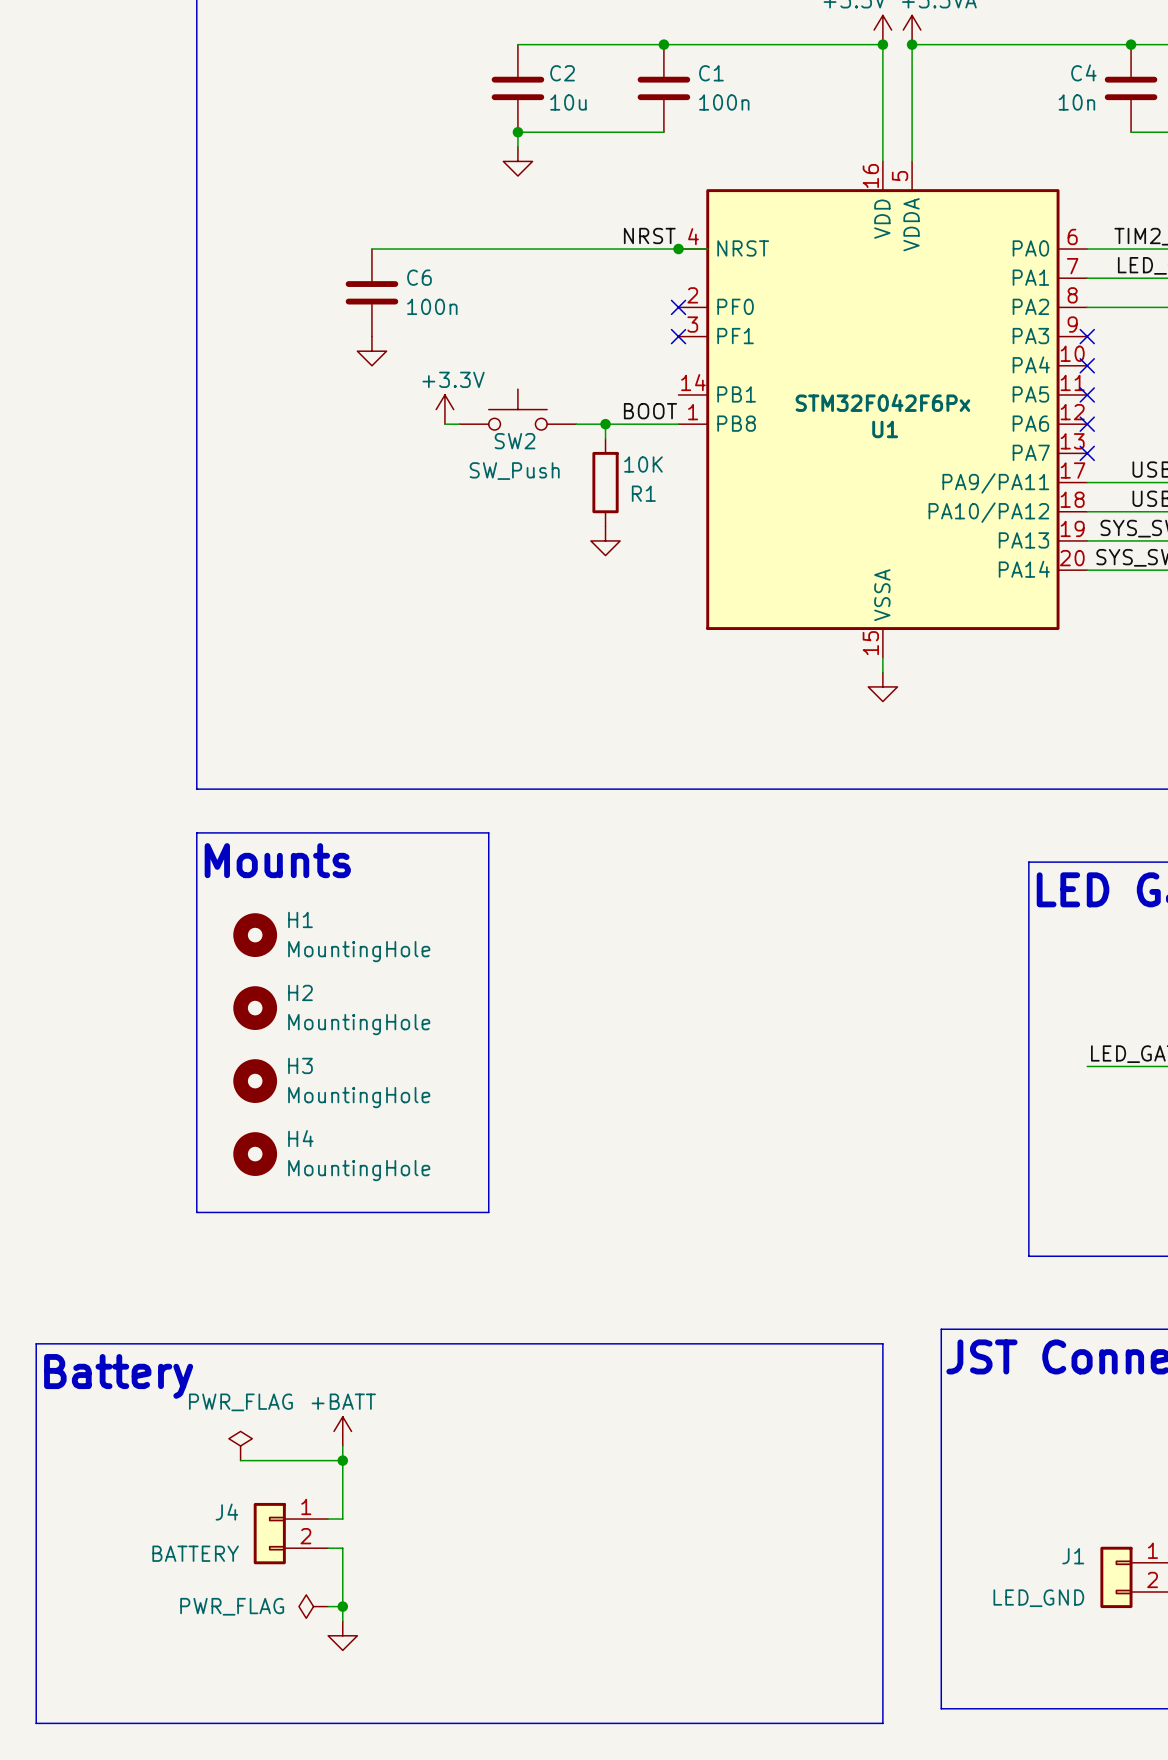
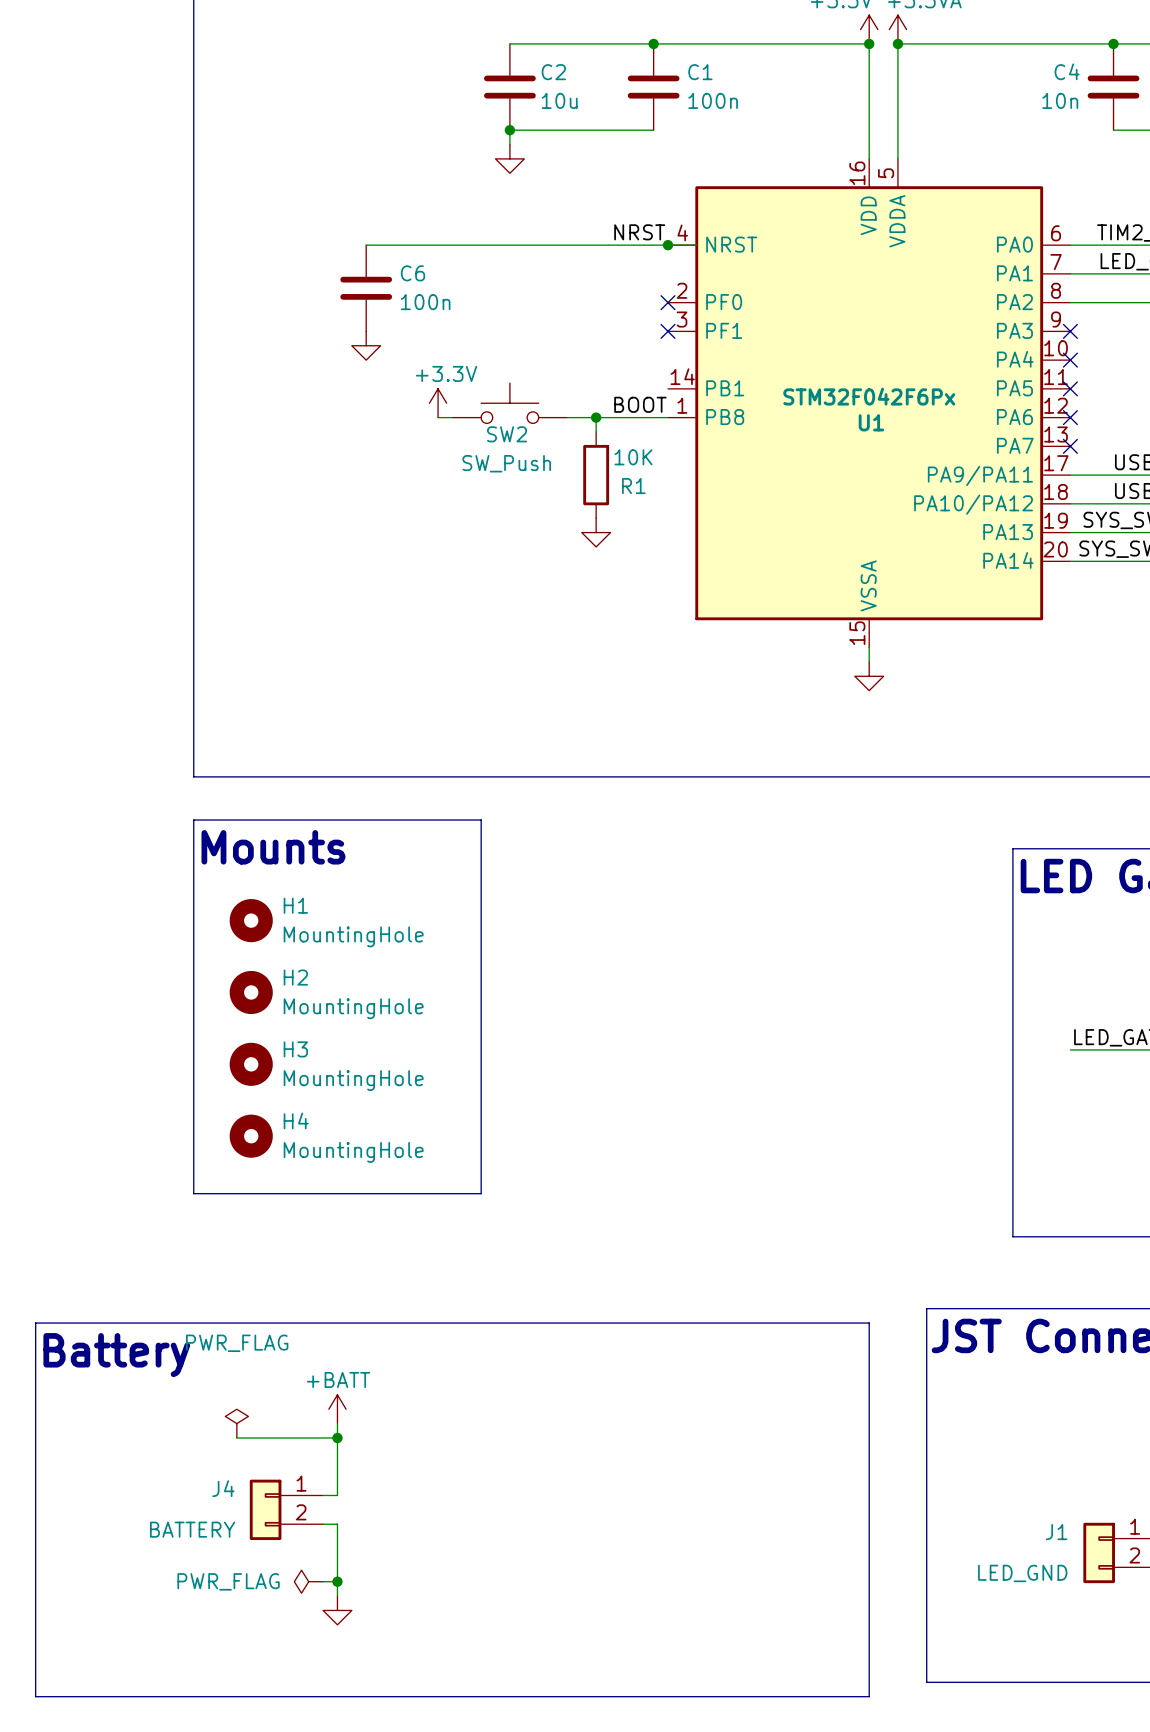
power symbol text position: PWR_FLAG (240, 1402) -> PWR_FLAG (237, 1343)

